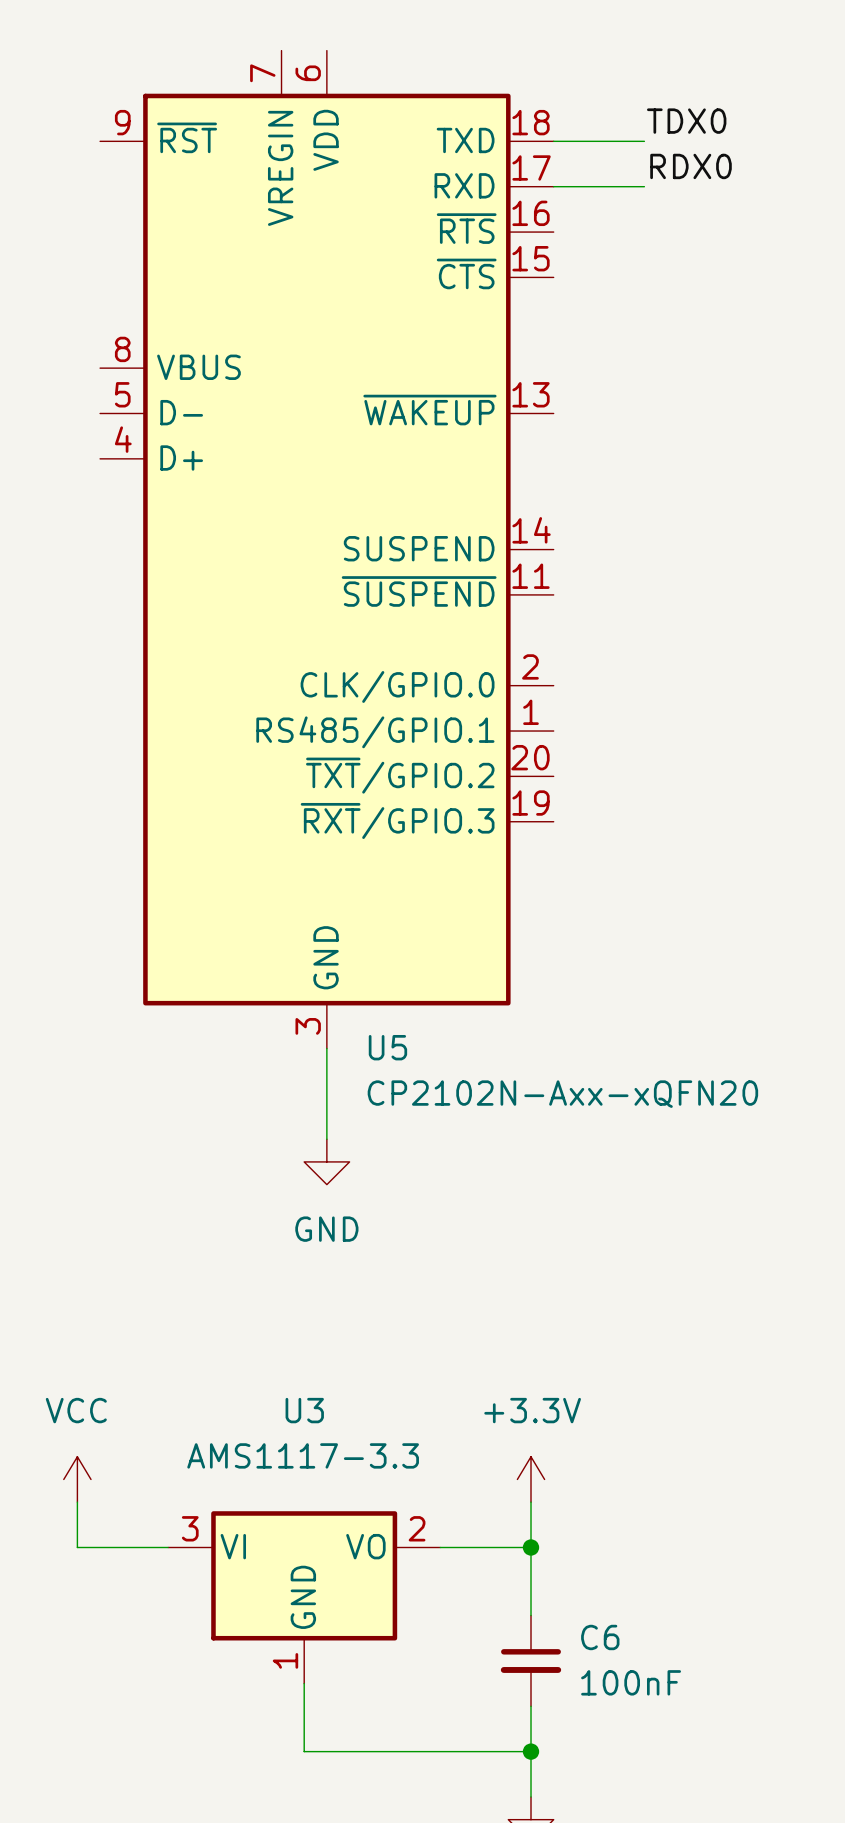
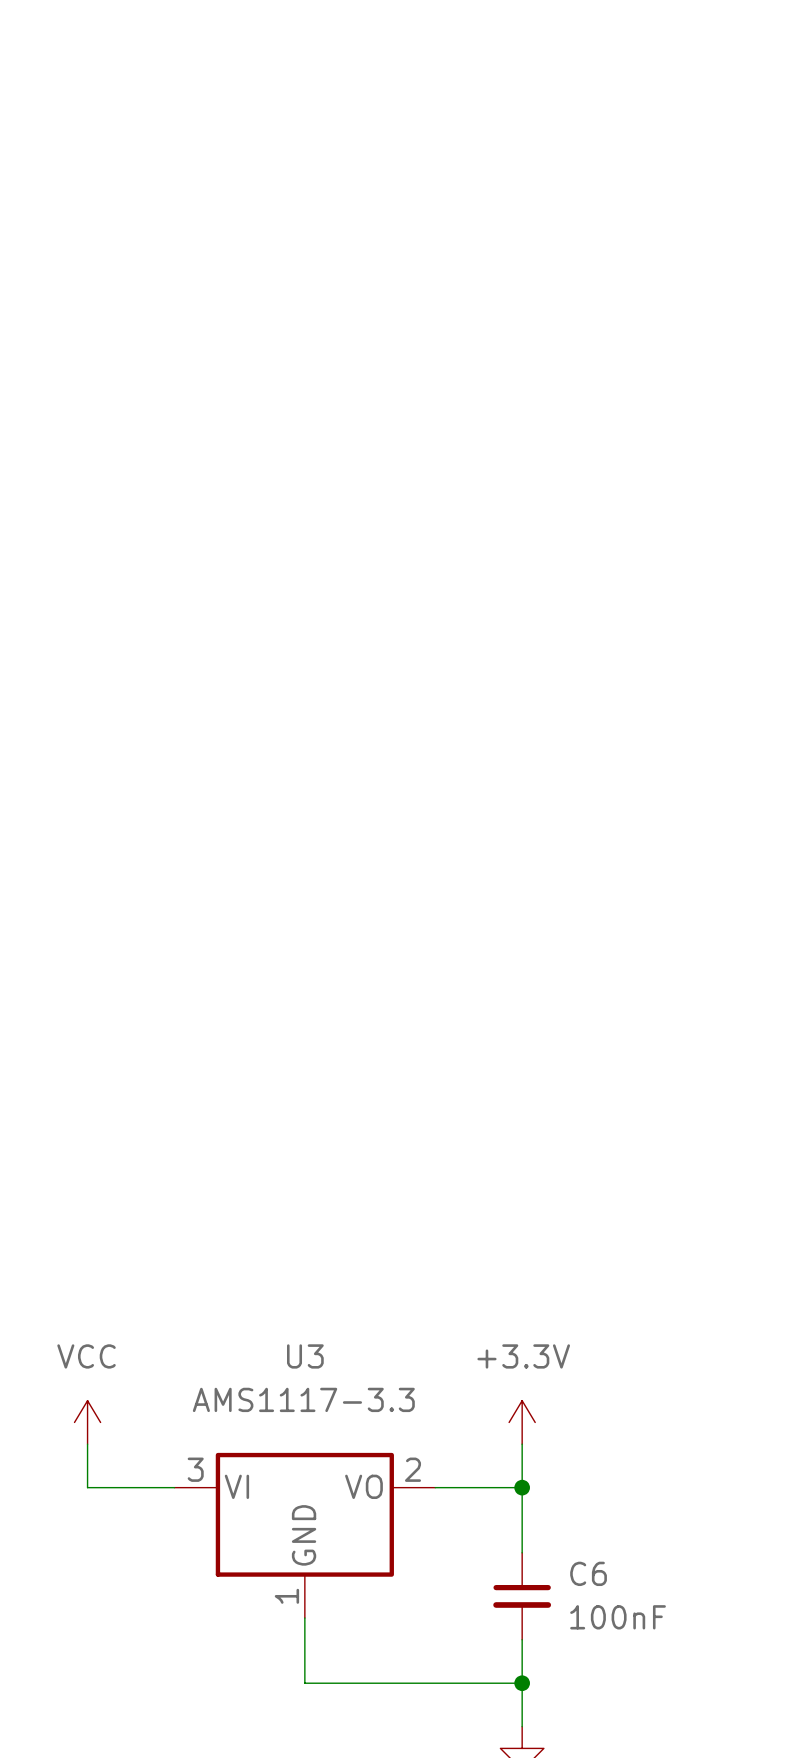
label: TDX0 (686, 121) -> none
wire: (553, 141) (644, 141) -> none
label: RDX0 (691, 166) -> none
wire: (553, 186) (644, 186) -> none
U5: CP2102N-Axx-xQFN20 (326, 549) -> none
wire: (326, 1048) (326, 1139) -> none
power symbol: GND (326, 1161) -> none

